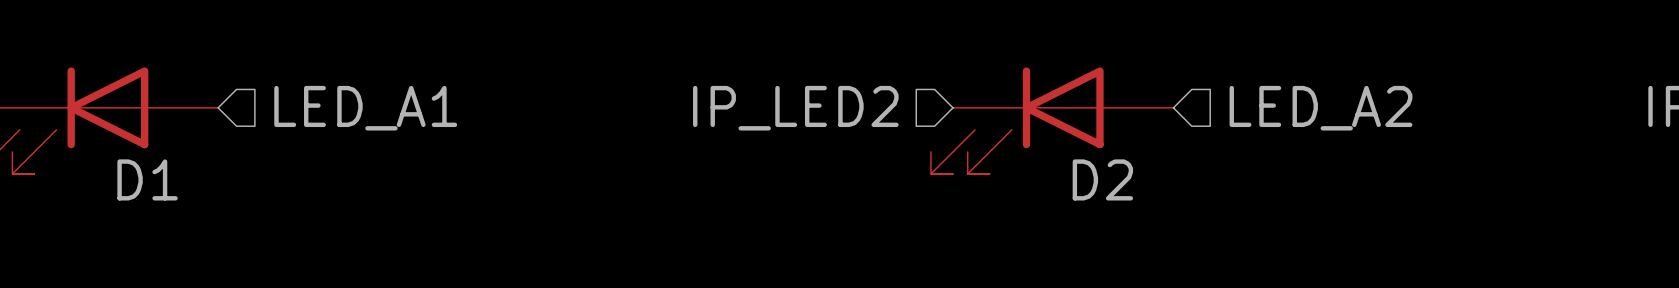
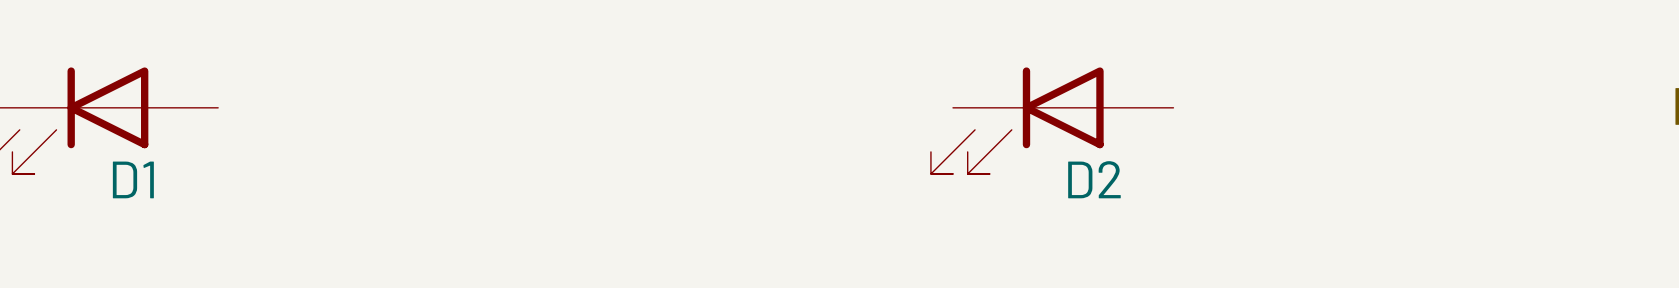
hierarchical label: LED_A1 (365, 108) -> none
hierarchical label: IP_LED2 (795, 108) -> none
hierarchical label: LED_A2 (1320, 108) -> none

